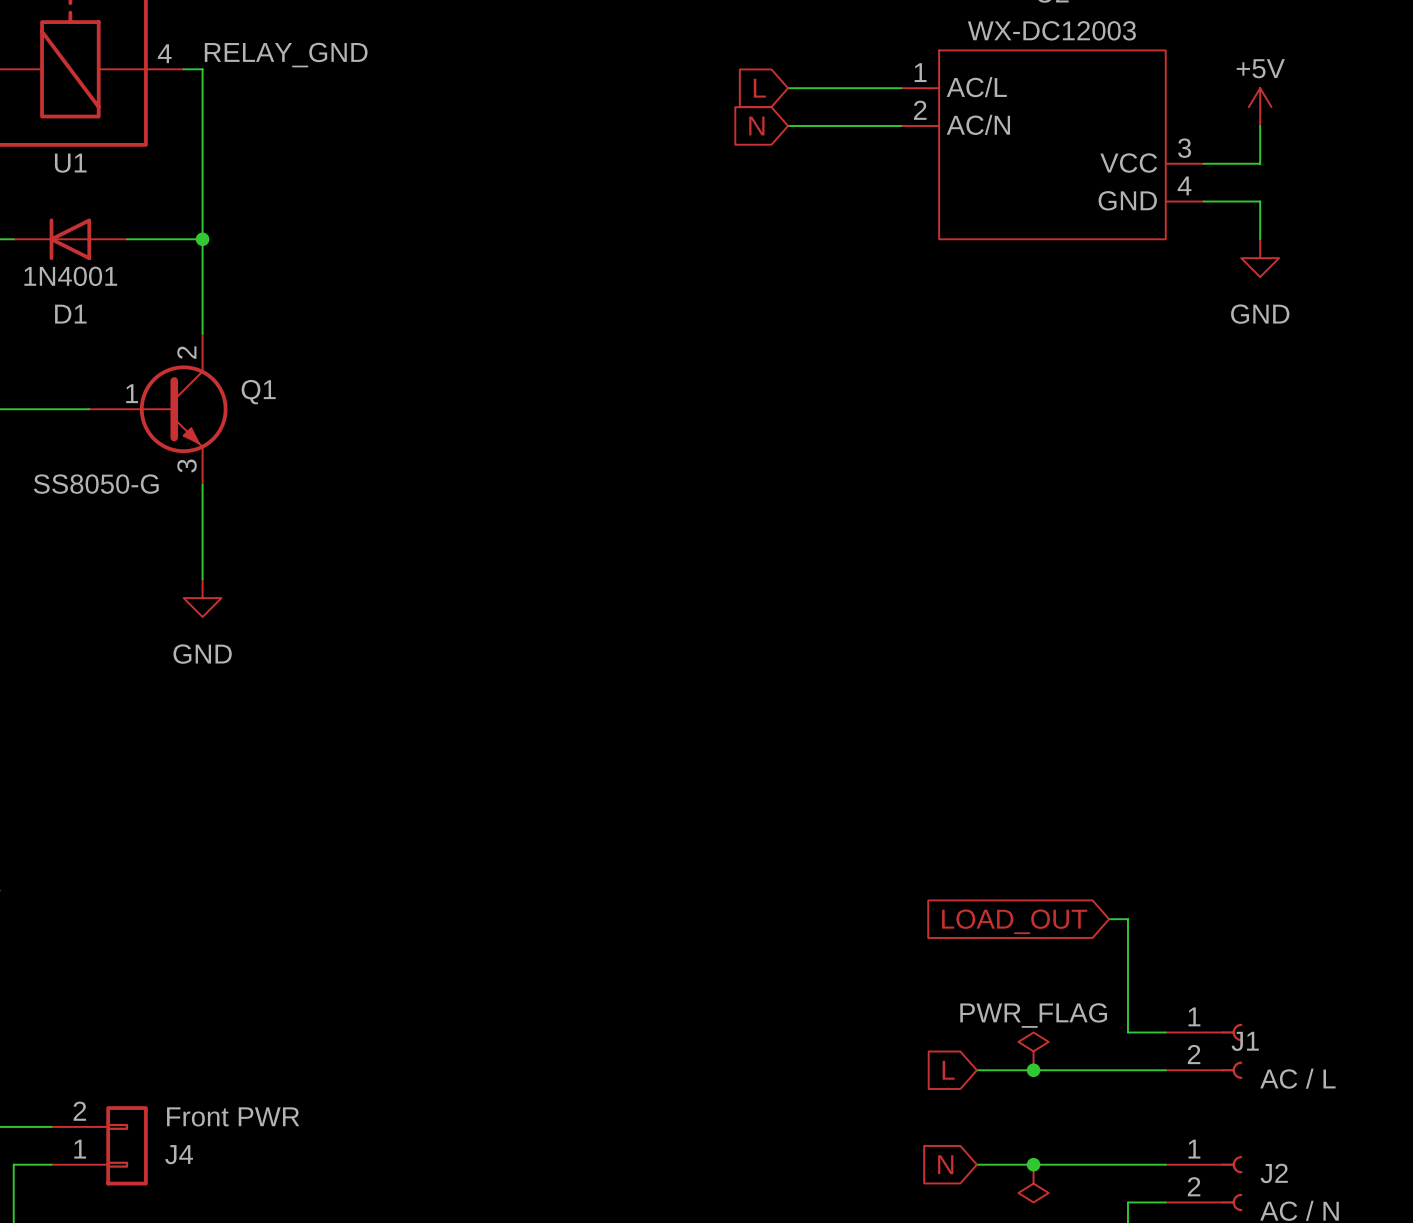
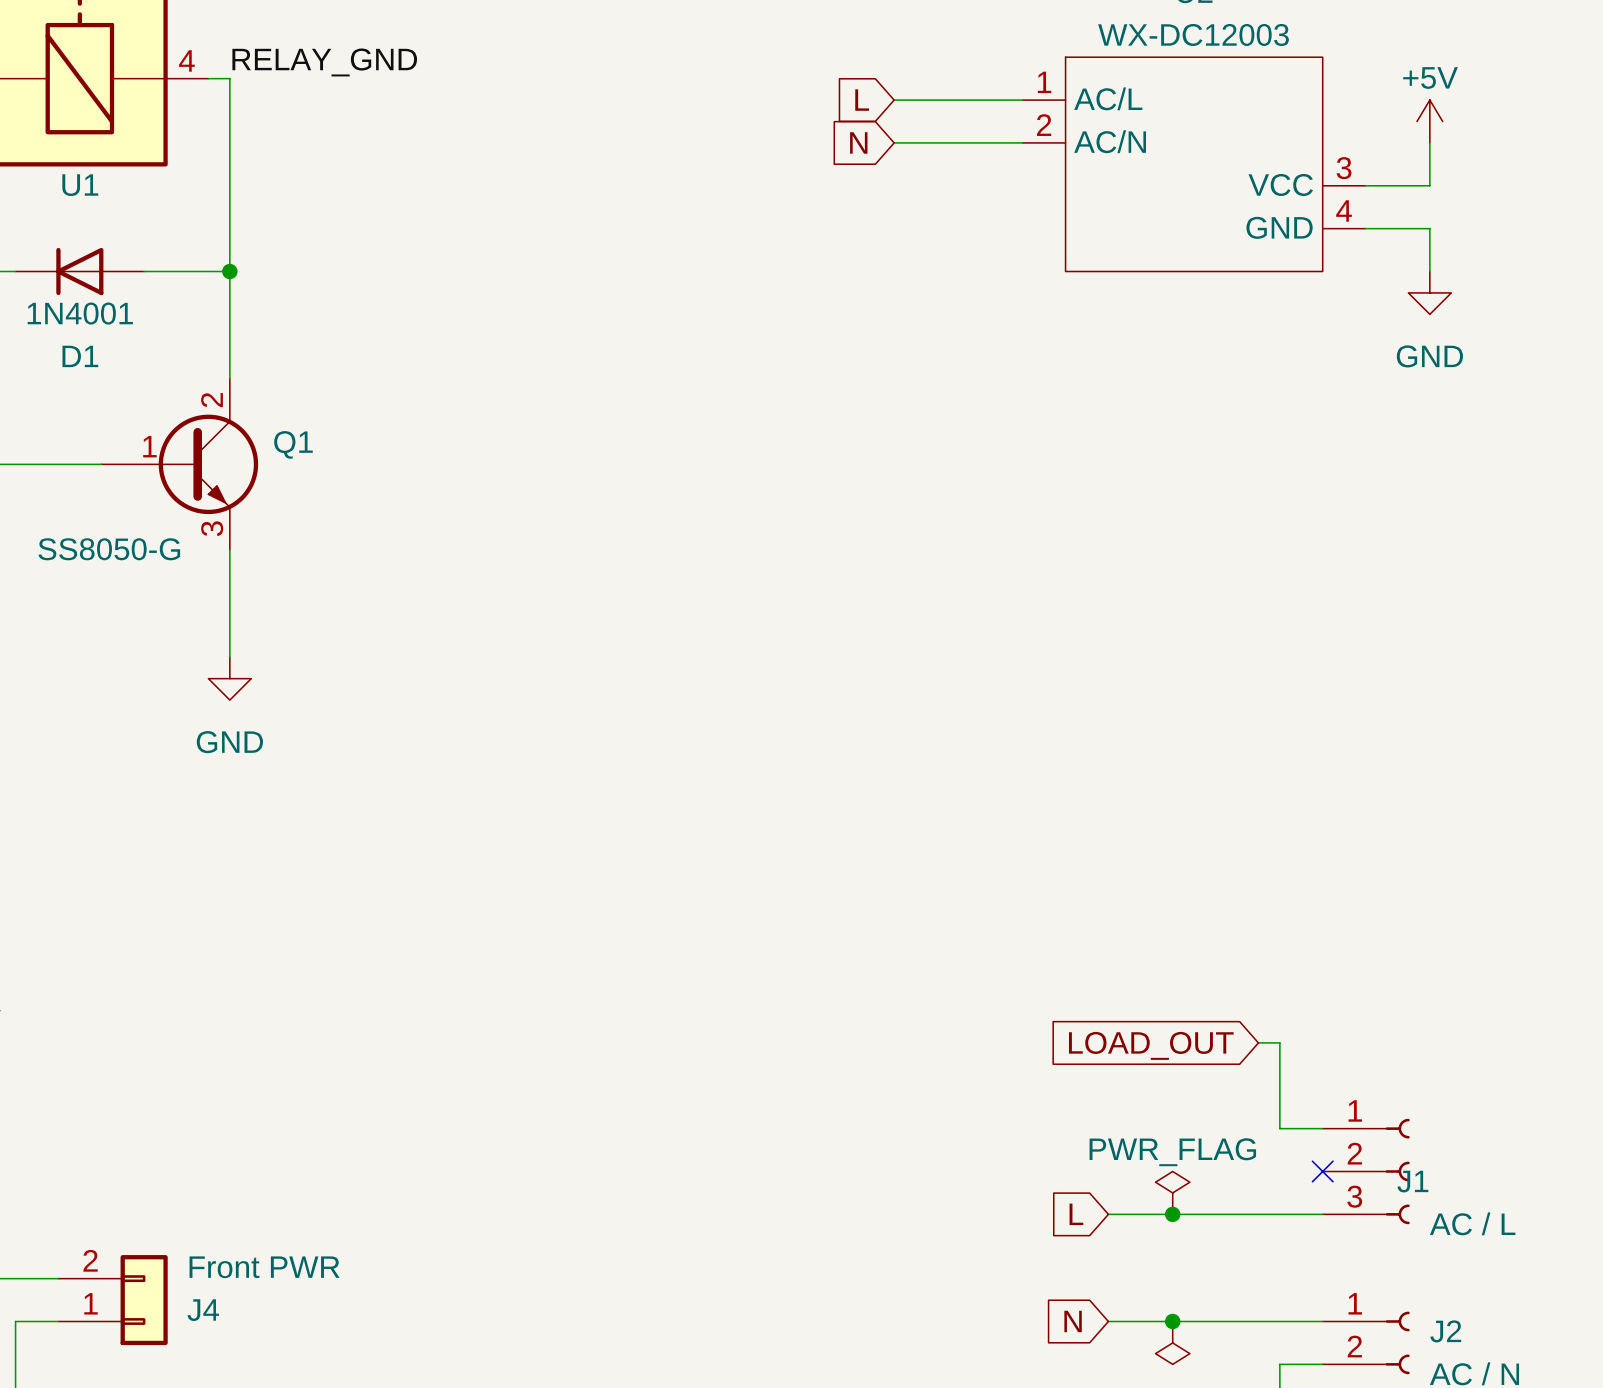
wire: (1127, 994) (1127, 1032) (1165, 1032) -> (1279, 1128) (1322, 1128)
J1 symbol: [1165, 1023, 1243, 1079] -> [1322, 1118, 1410, 1225]
no-connect mark: none -> (1322, 1171)

